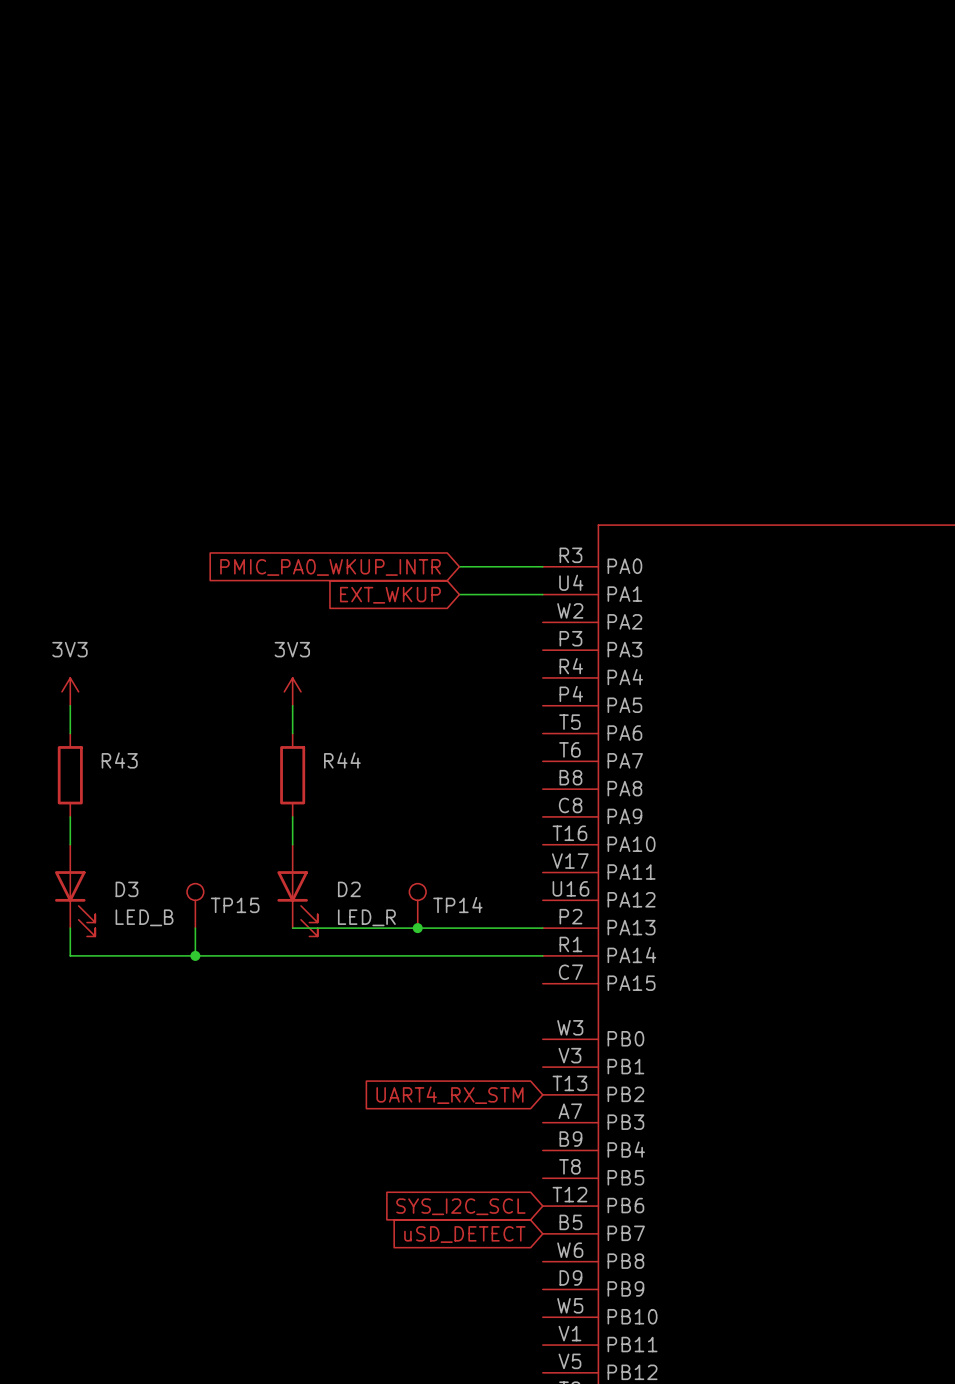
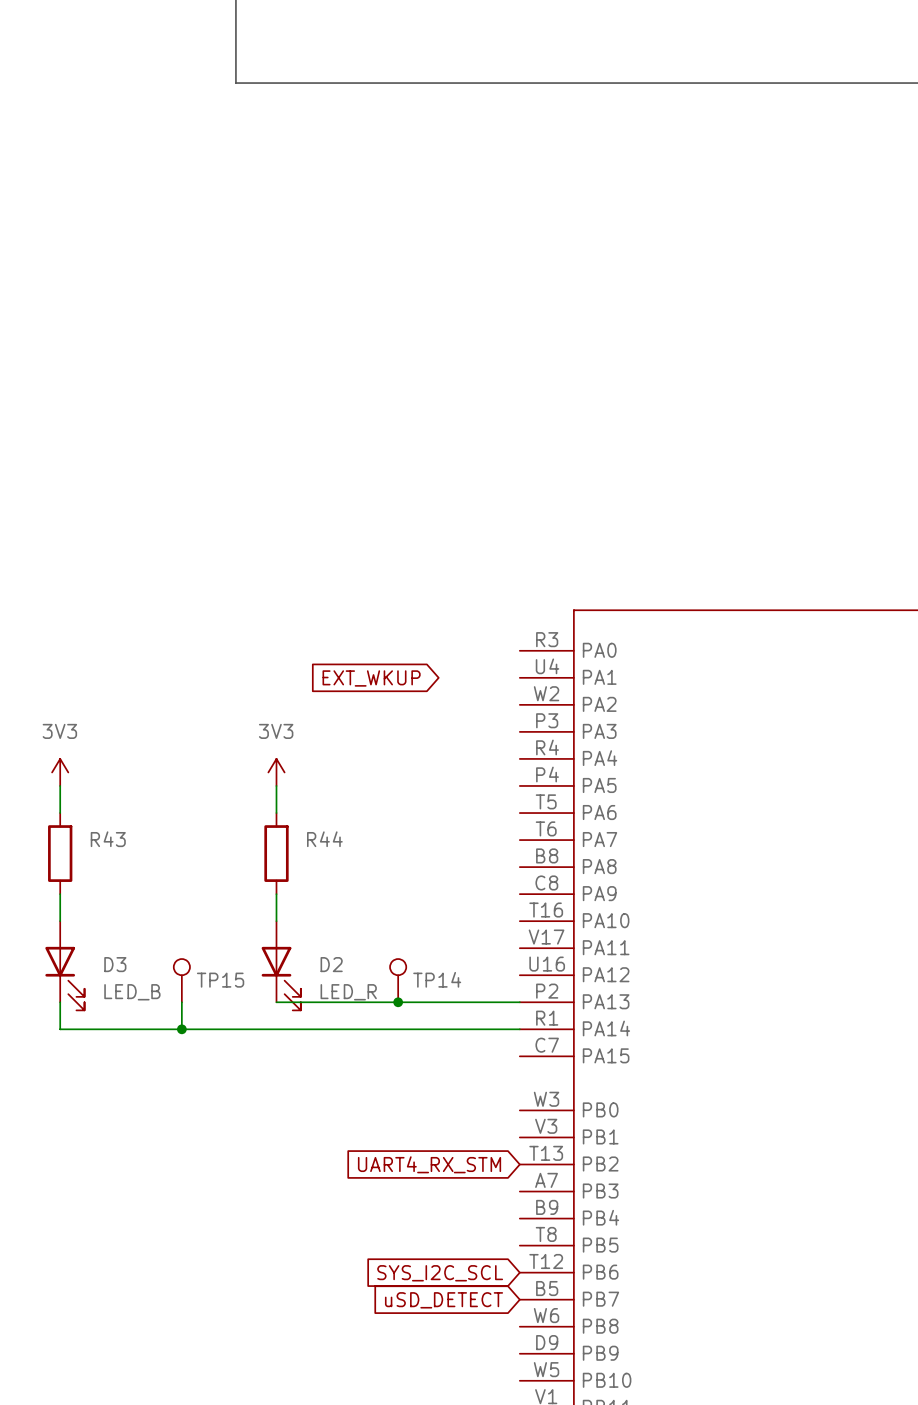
wire: (459, 566) (542, 566) -> none
global label: PMIC_PA0_WKUP_INTR (330, 567) -> none
wire: (459, 594) (542, 594) -> none

